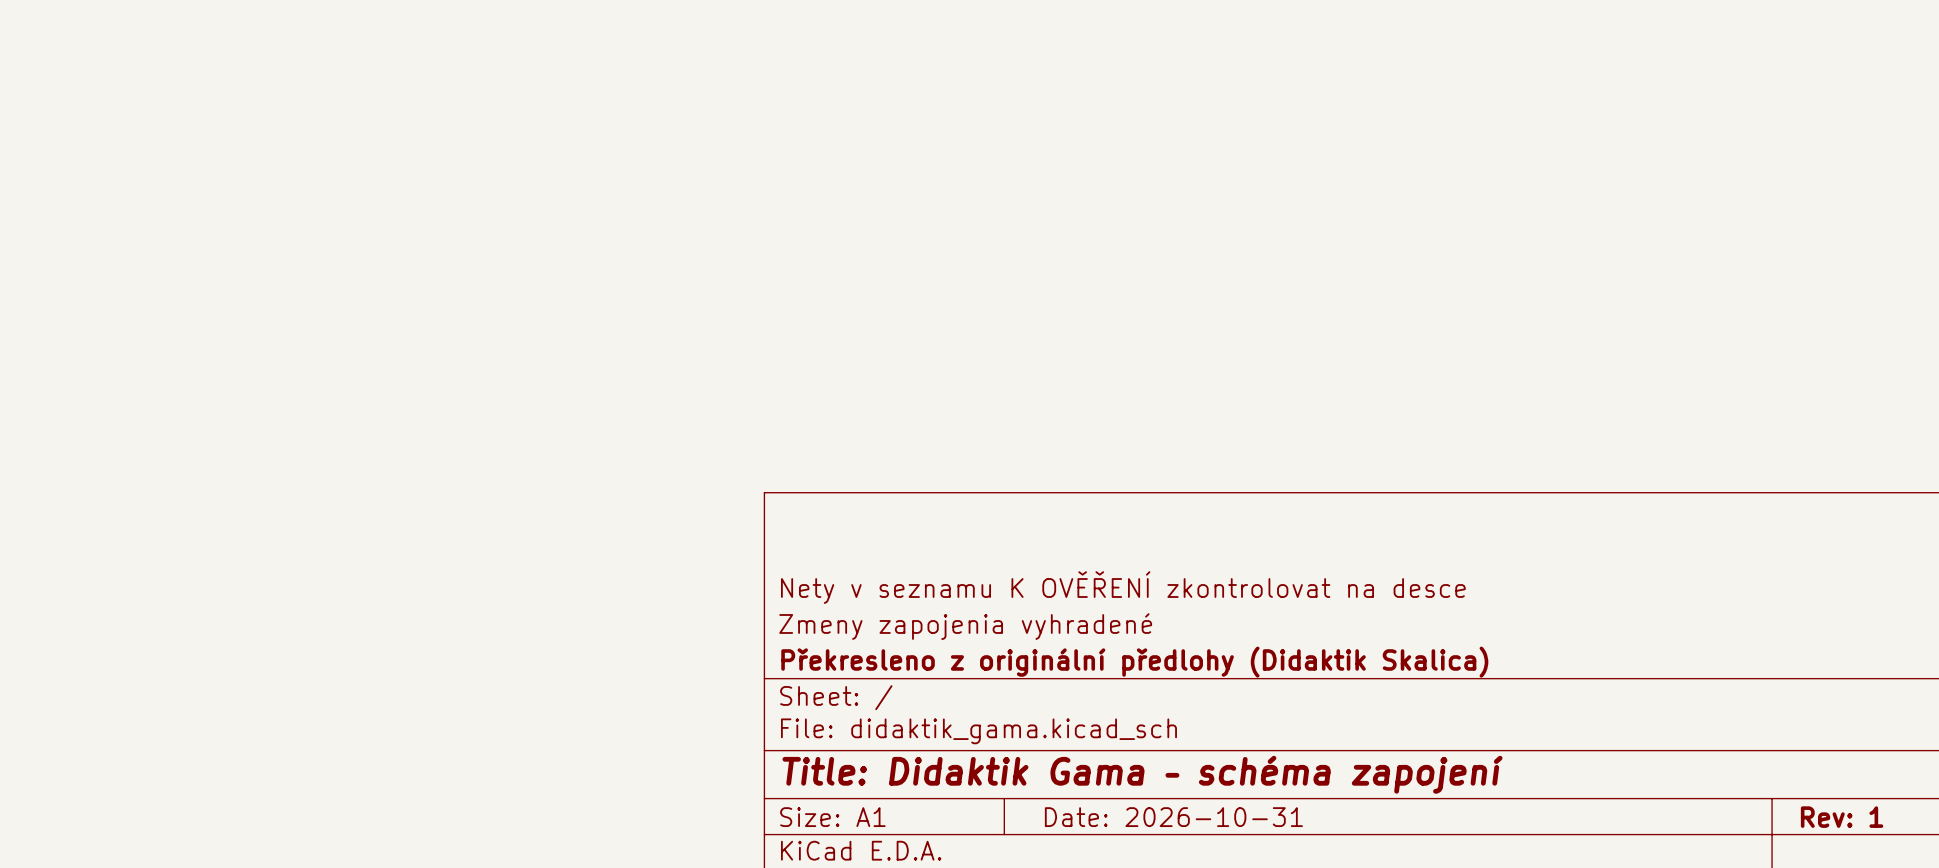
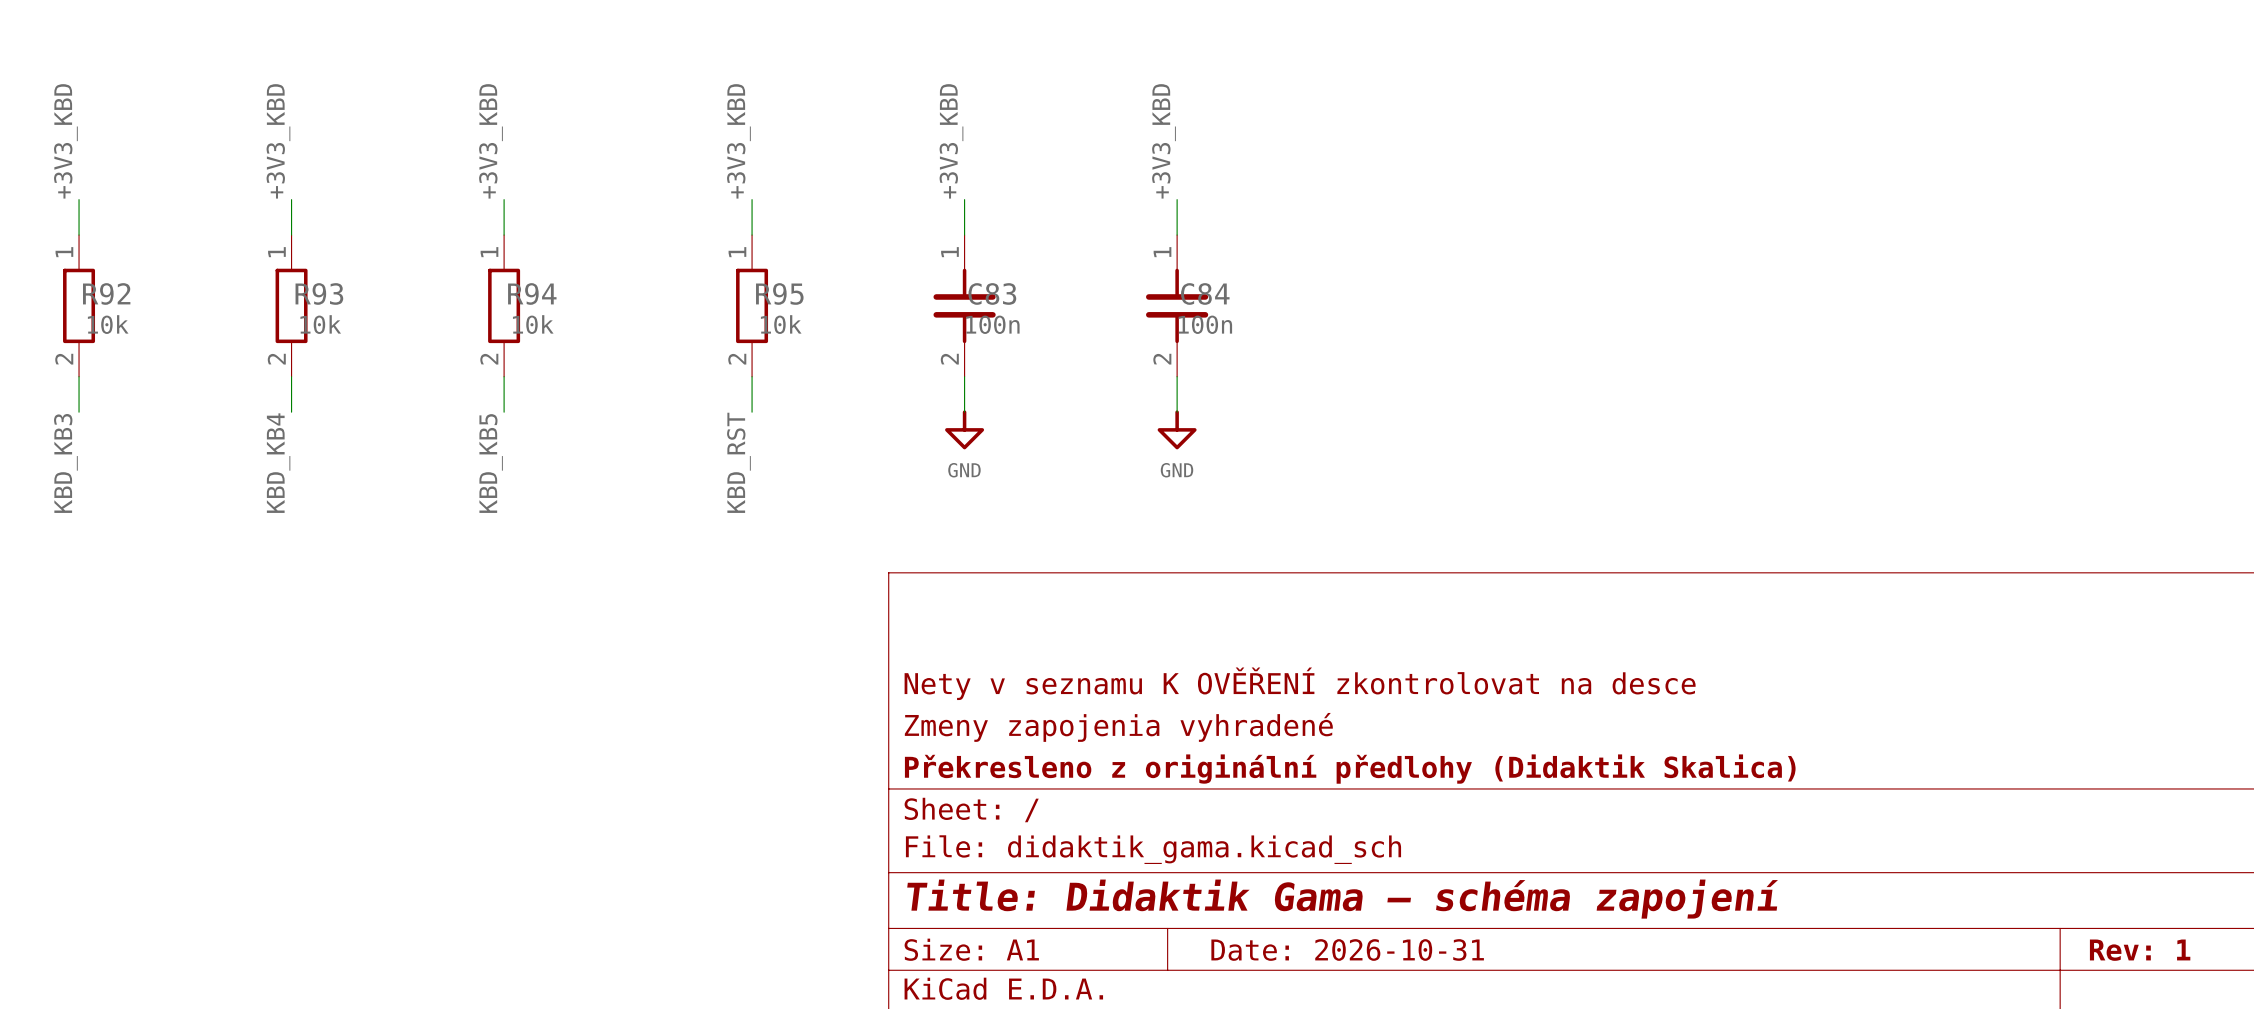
label: none -> +3V3_KBD (65, 141)
label: none -> +3V3_KBD (278, 141)
label: none -> +3V3_KBD (490, 141)
label: none -> +3V3_KBD (738, 141)
label: none -> +3V3_KBD (951, 141)
label: none -> +3V3_KBD (1164, 141)
wire: none -> (79, 199) (79, 235)
wire: none -> (291, 199) (291, 235)
wire: none -> (504, 199) (504, 235)
wire: none -> (752, 199) (752, 235)
wire: none -> (964, 199) (964, 235)
wire: none -> (1177, 199) (1177, 235)
R92: none -> 10k (79, 305)
R93: none -> 10k (291, 305)
R94: none -> 10k (504, 305)
R95: none -> 10k (752, 305)
C83: none -> 100n (964, 305)
C84: none -> 100n (1177, 305)
wire: none -> (79, 376) (79, 412)
wire: none -> (291, 376) (291, 412)
wire: none -> (504, 376) (504, 412)
wire: none -> (752, 376) (752, 412)
wire: none -> (964, 376) (964, 412)
wire: none -> (1177, 376) (1177, 412)
power symbol: none -> GND (964, 429)
power symbol: none -> GND (1177, 429)
label: none -> KBD_RST (738, 462)
label: none -> KBD_KB3 (65, 463)
label: none -> KBD_KB4 (278, 463)
label: none -> KBD_KB5 (491, 463)

